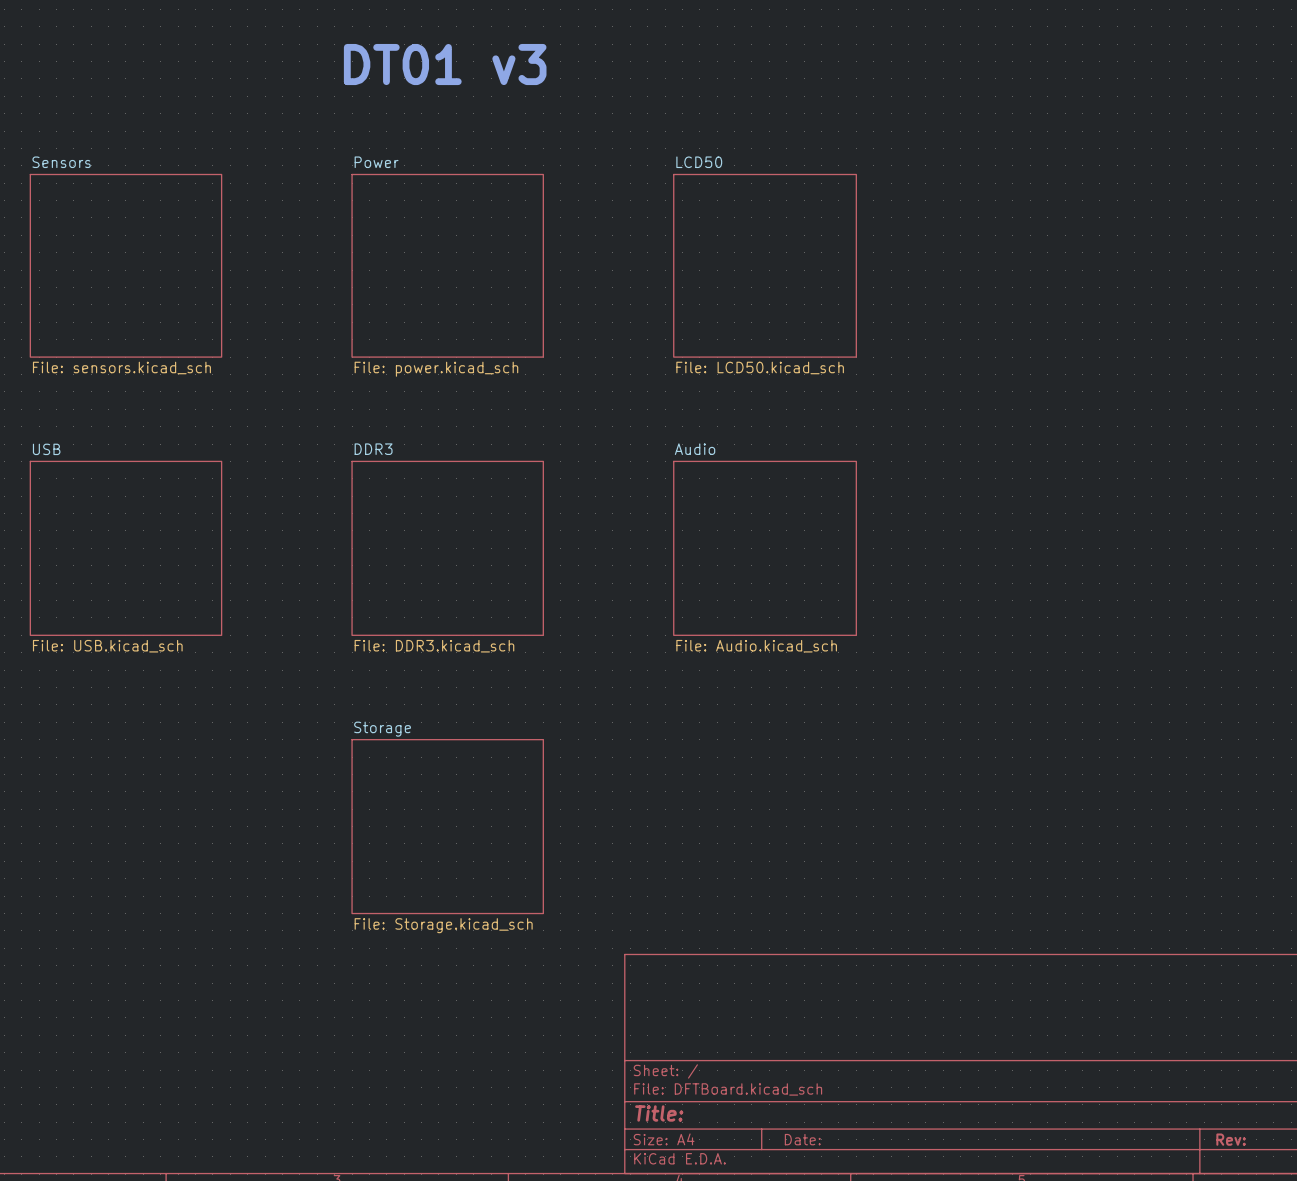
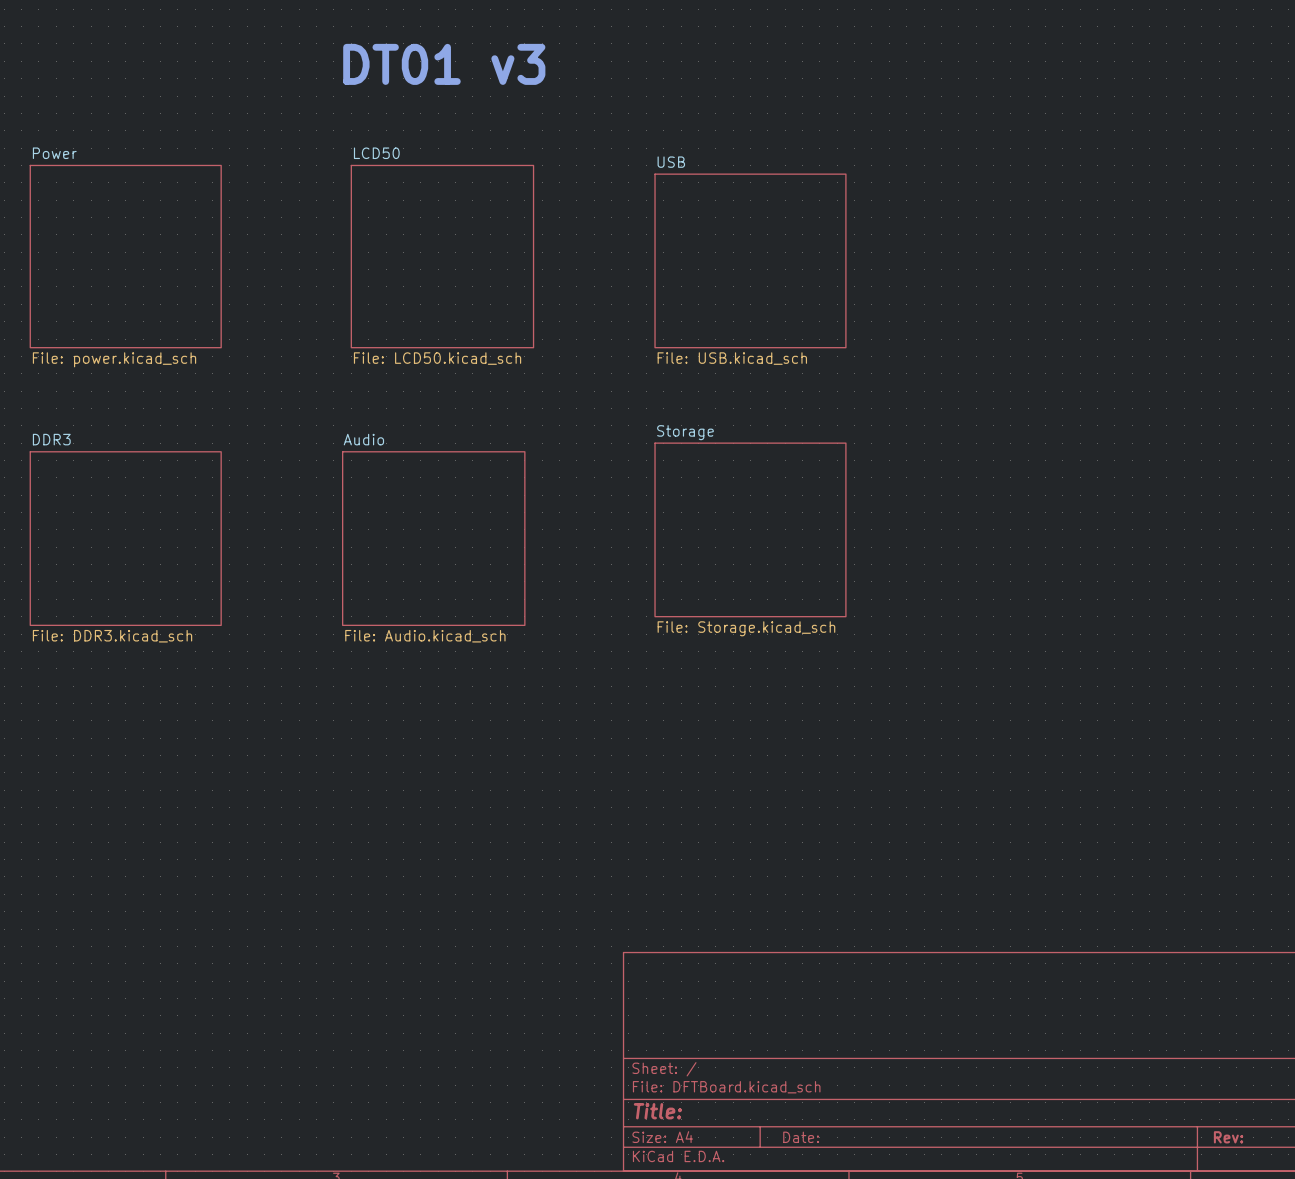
sheet Power: none -> File: power.kicad_sch (125, 256)
sheet USB: none -> File: USB.kicad_sch (750, 260)
sheet Sensors: File: sensors.kicad_sch (125, 265) -> none
sheet Power: File: power.kicad_sch (447, 265) -> none
sheet LCD50 position: (765, 265) -> (442, 256)
sheet Storage: none -> File: Storage.kicad_sch (750, 529)
sheet Audio: none -> File: Audio.kicad_sch (433, 538)
sheet USB: File: USB.kicad_sch (125, 548) -> none
sheet DDR3 position: (447, 548) -> (125, 538)
sheet Audio: File: Audio.kicad_sch (765, 548) -> none
sheet Storage: File: Storage.kicad_sch (447, 826) -> none

